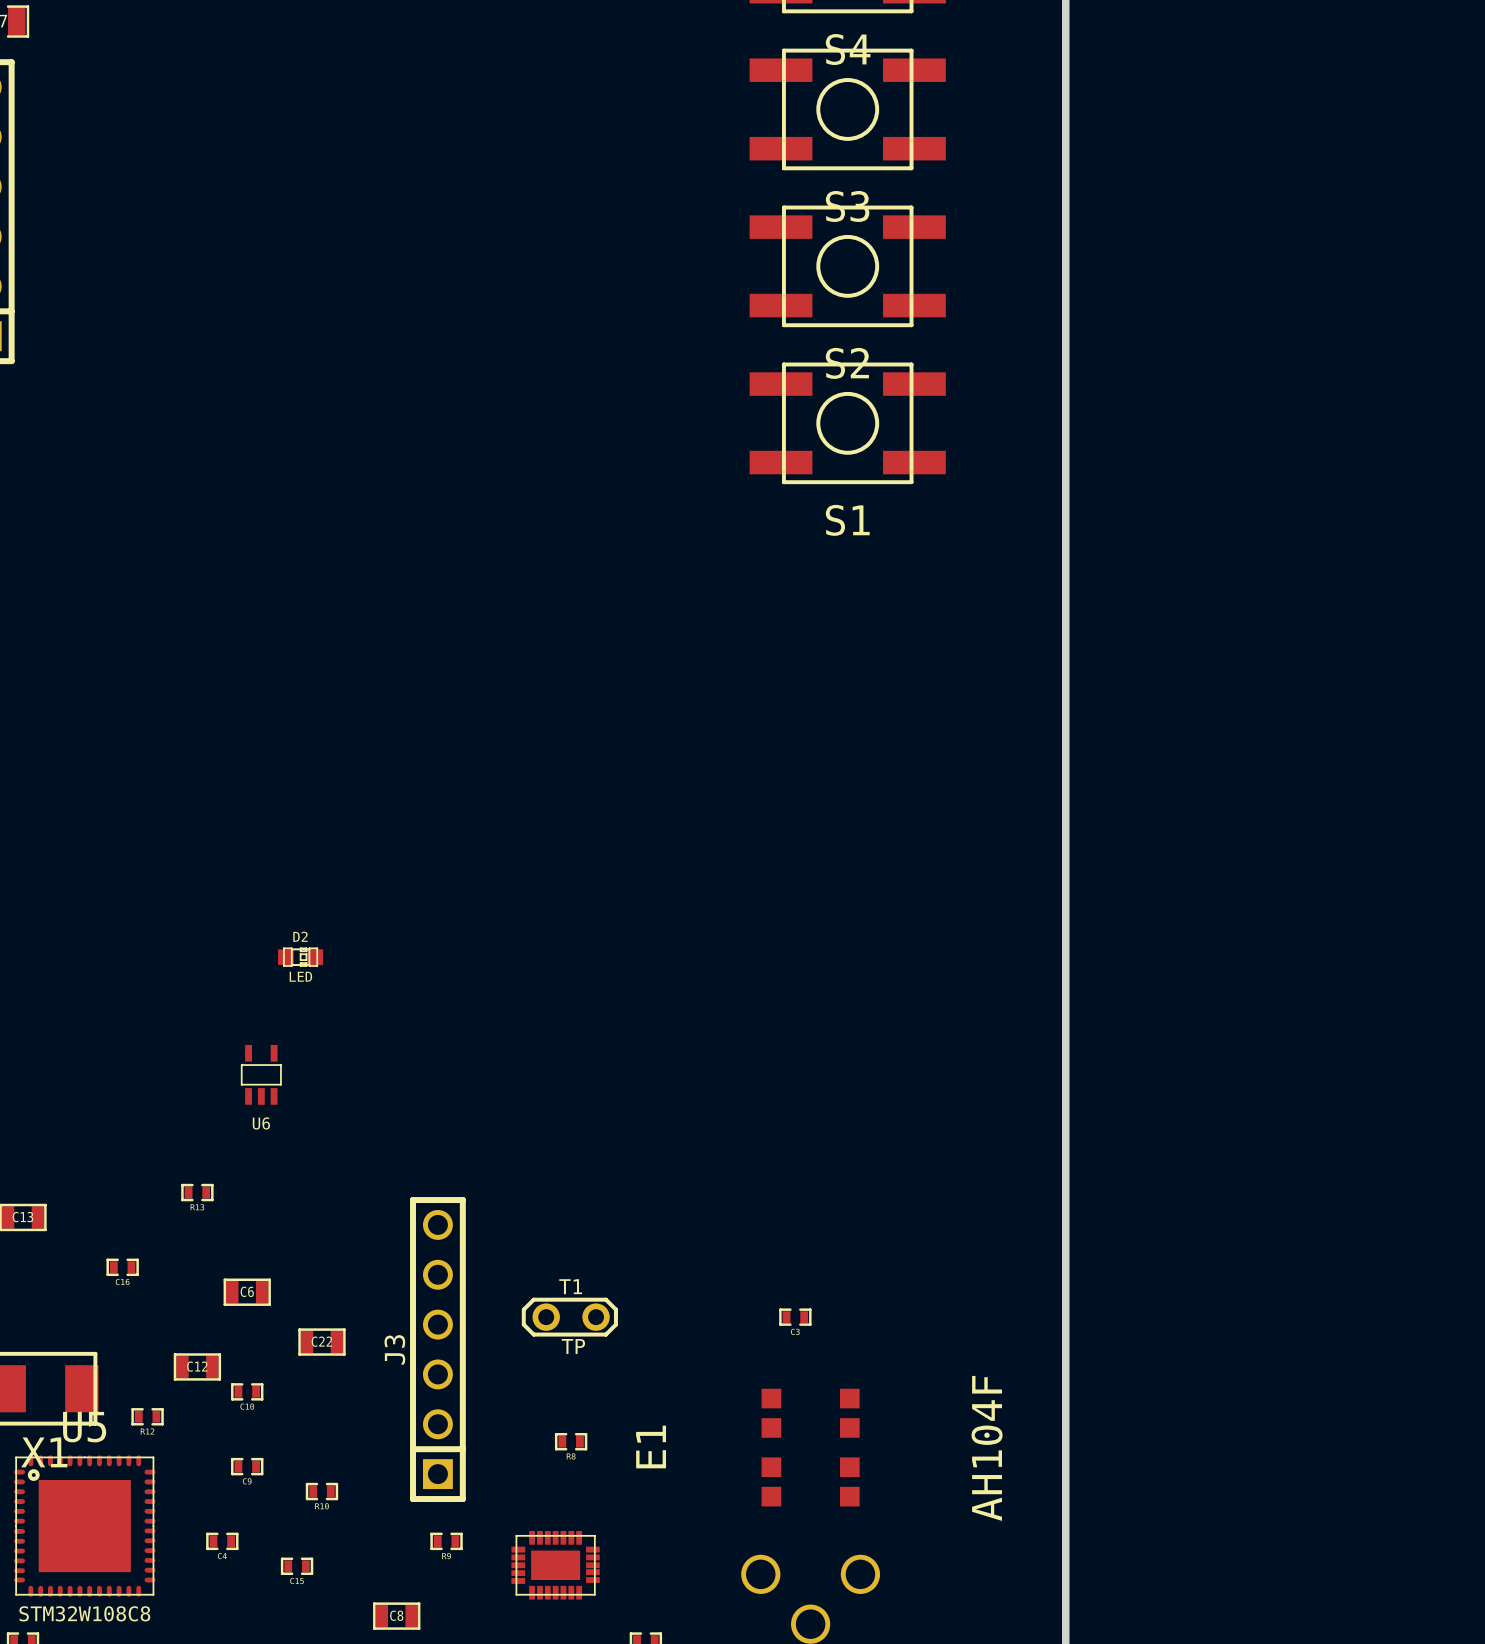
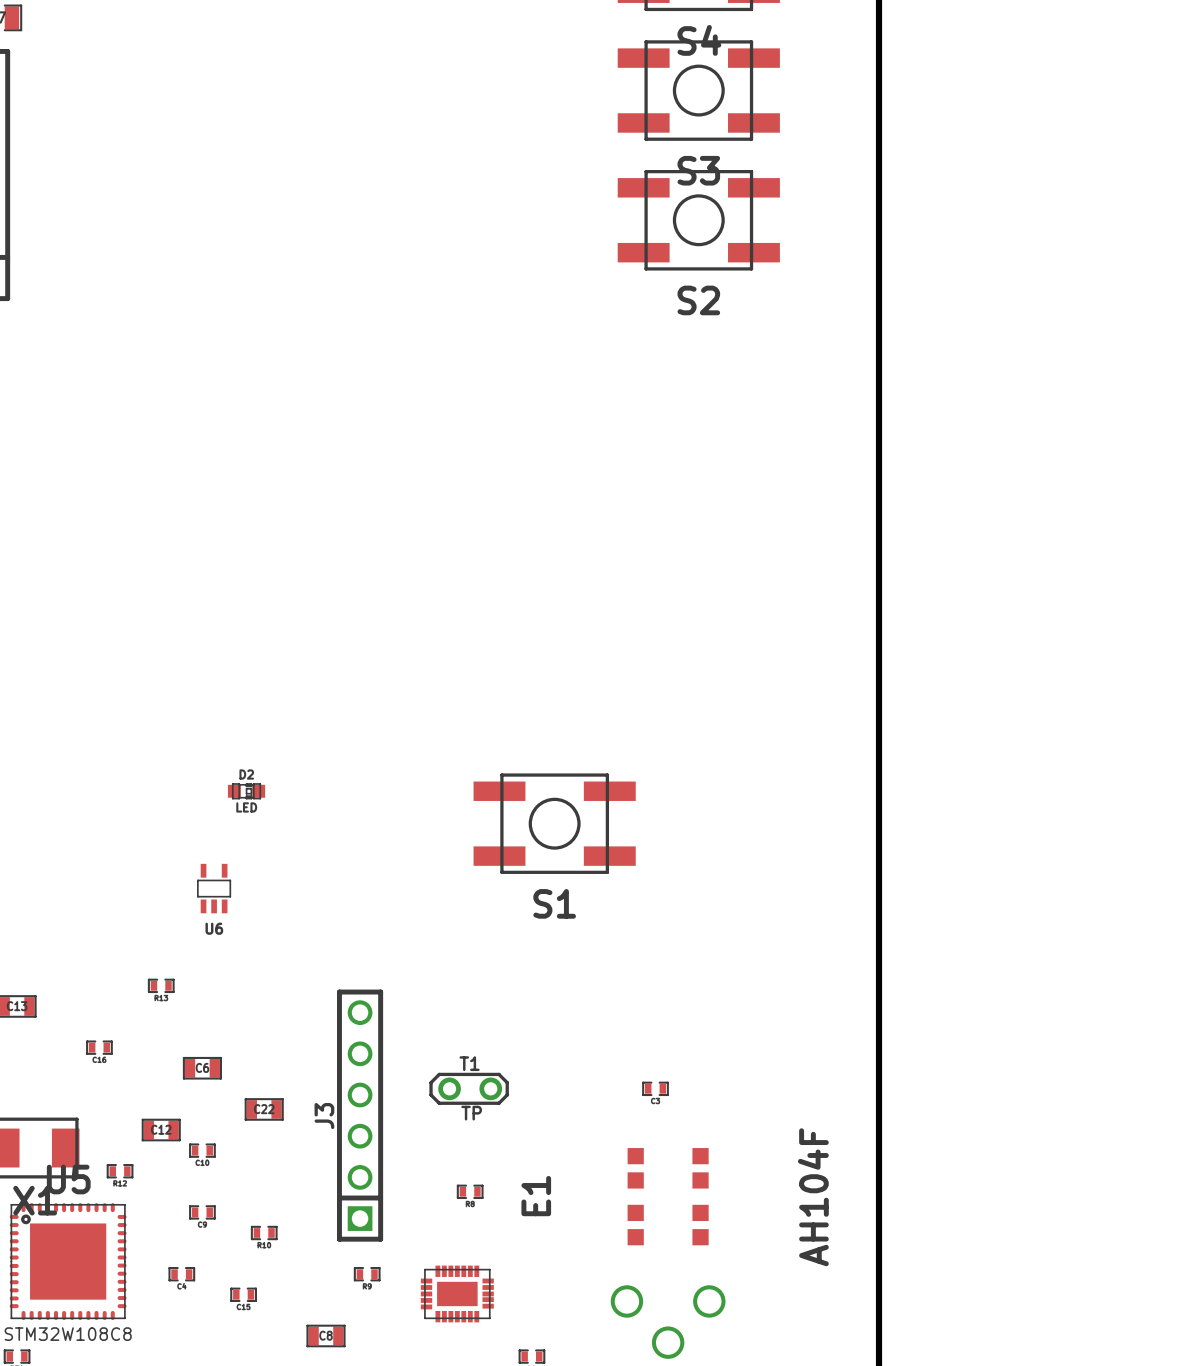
S1 position: (847, 423) -> (554, 823)

